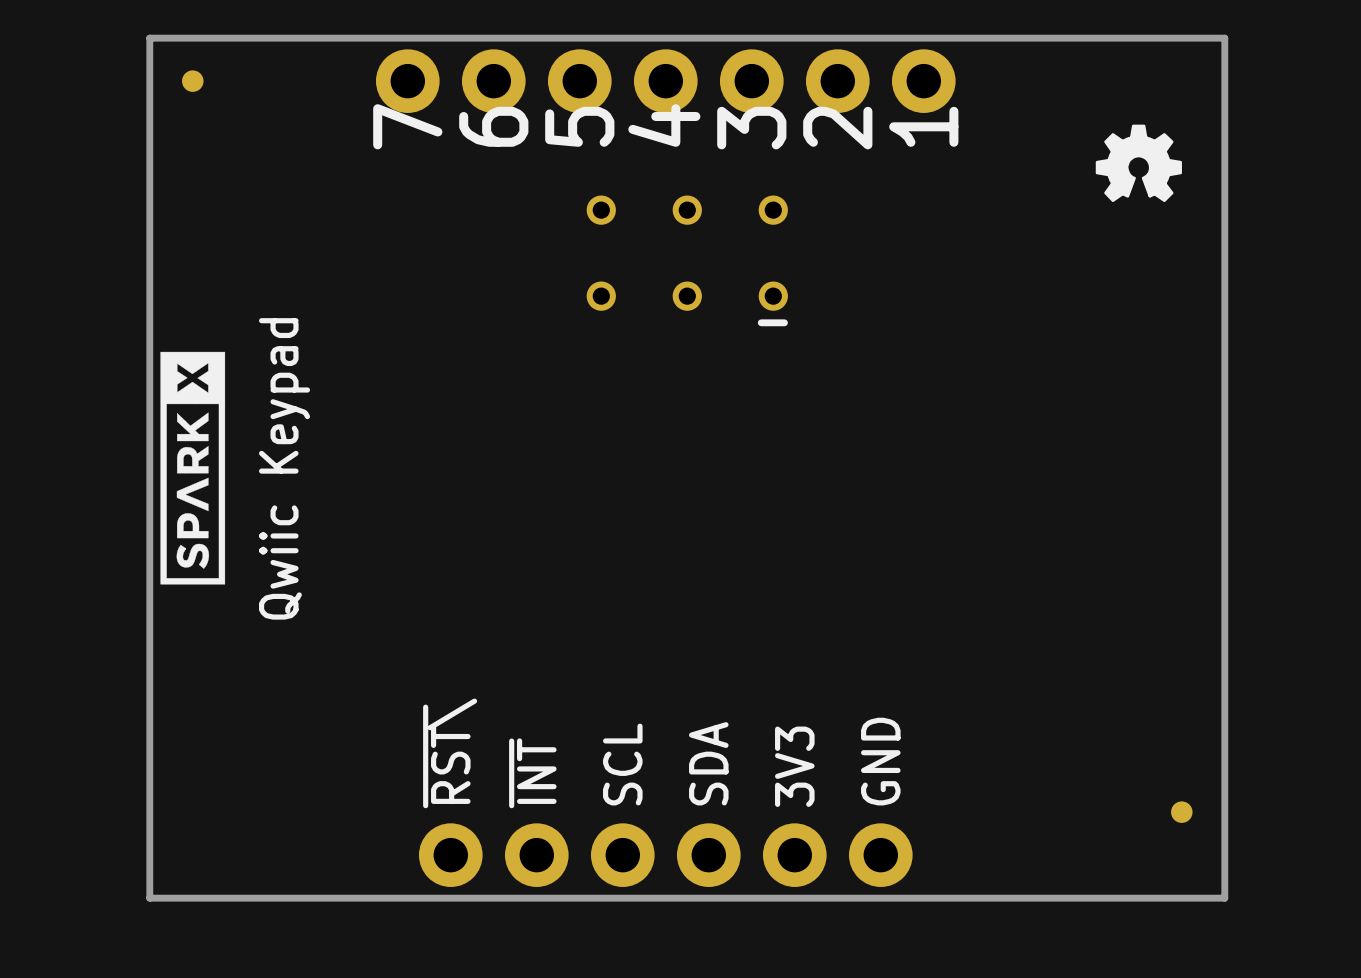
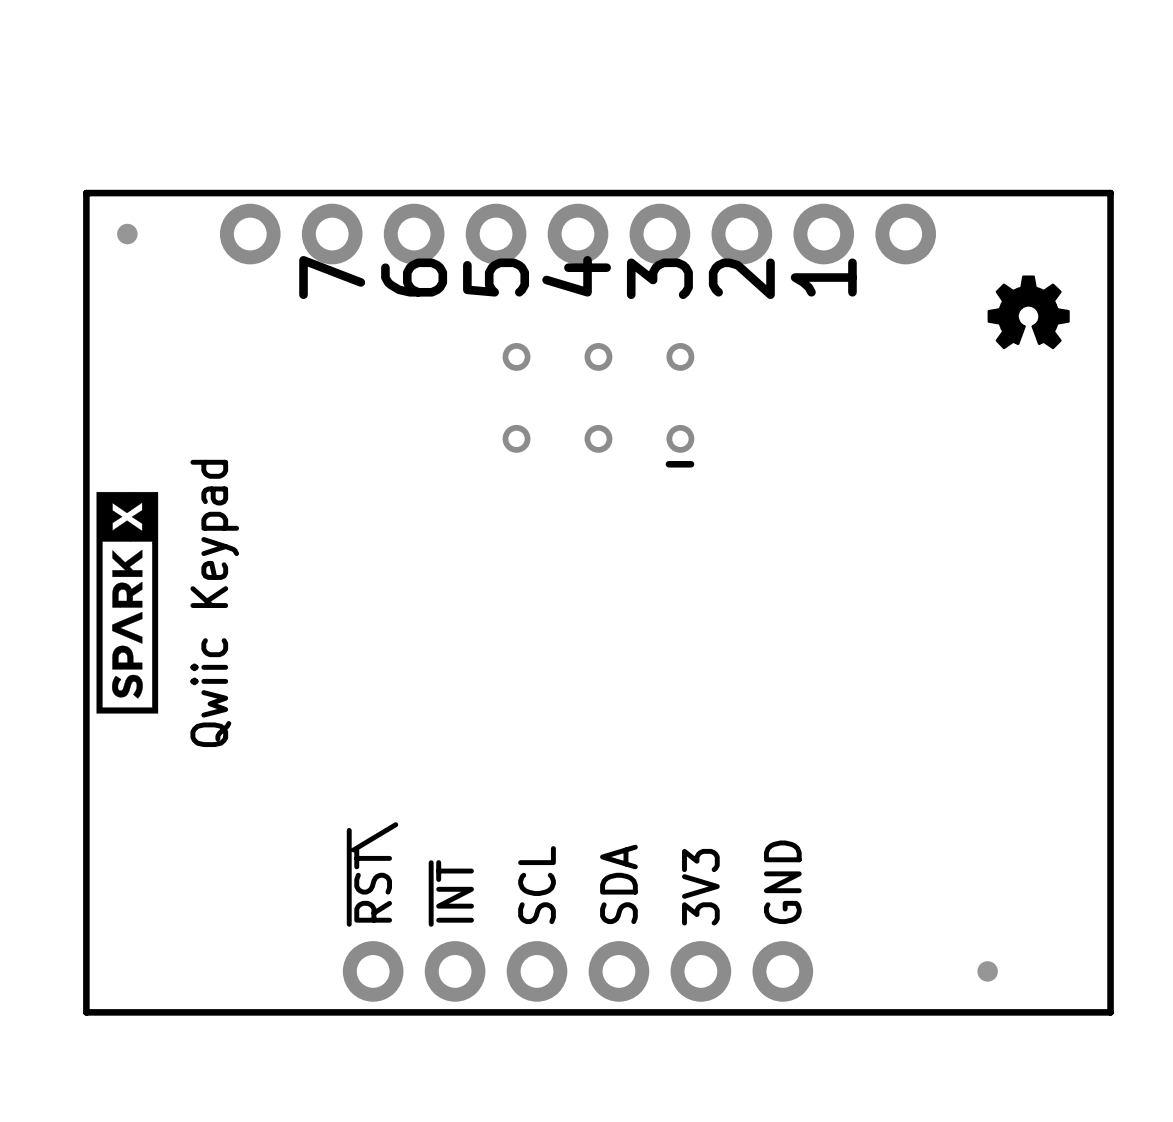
part footprint: [375, 49, 956, 113] -> [219, 203, 937, 265]
part position: (1181, 812) -> (987, 971)

